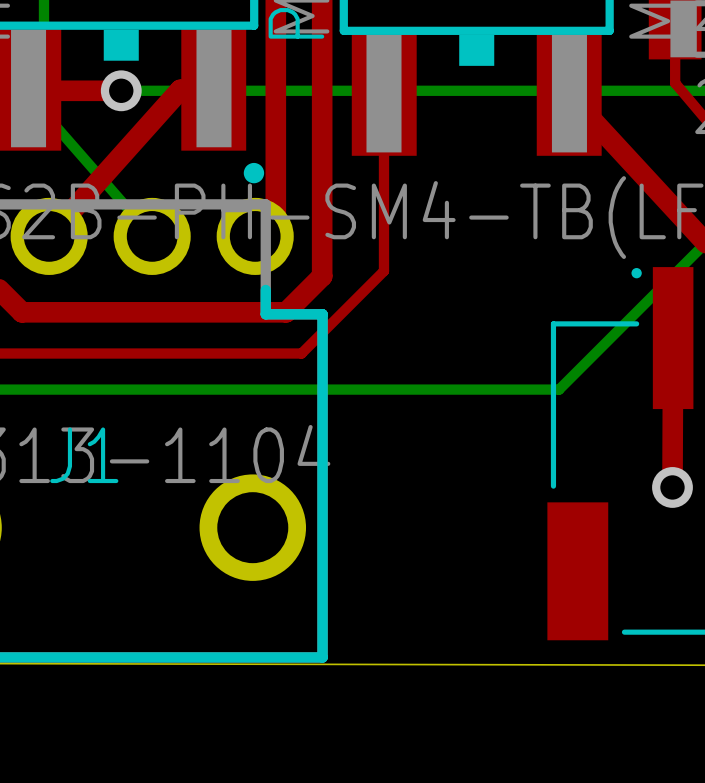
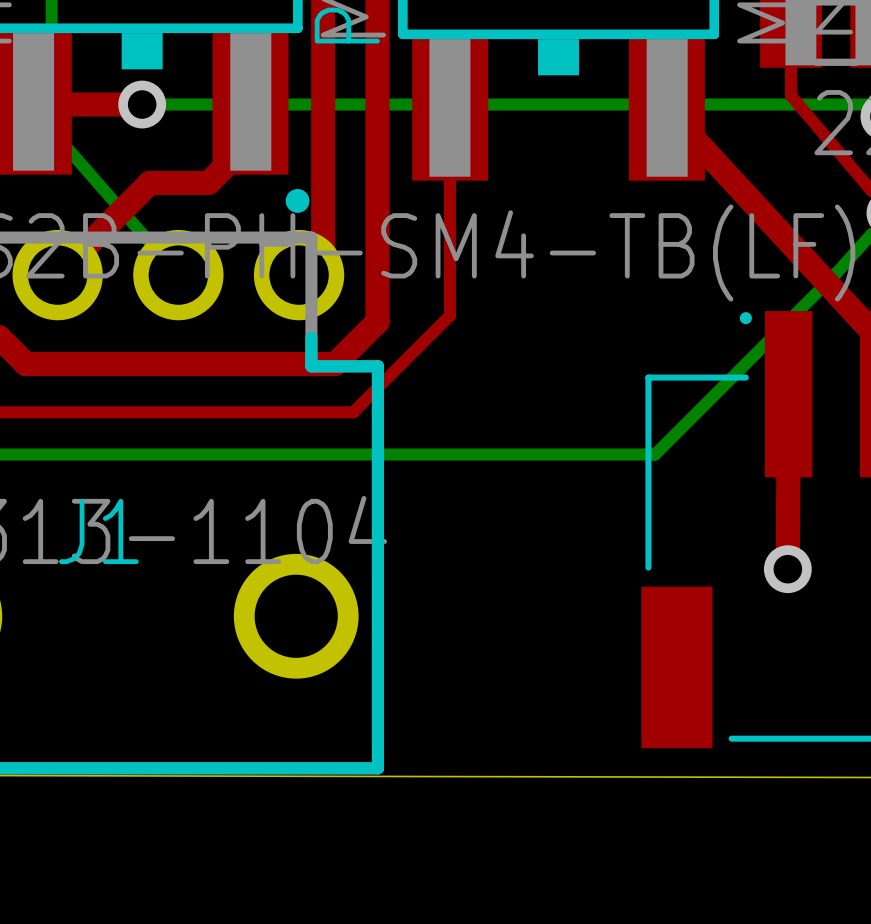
top track: (213, 89) (180, 89) (49, 236) -> (250, 103) (250, 141) (208, 182) (149, 182) (57, 275)

